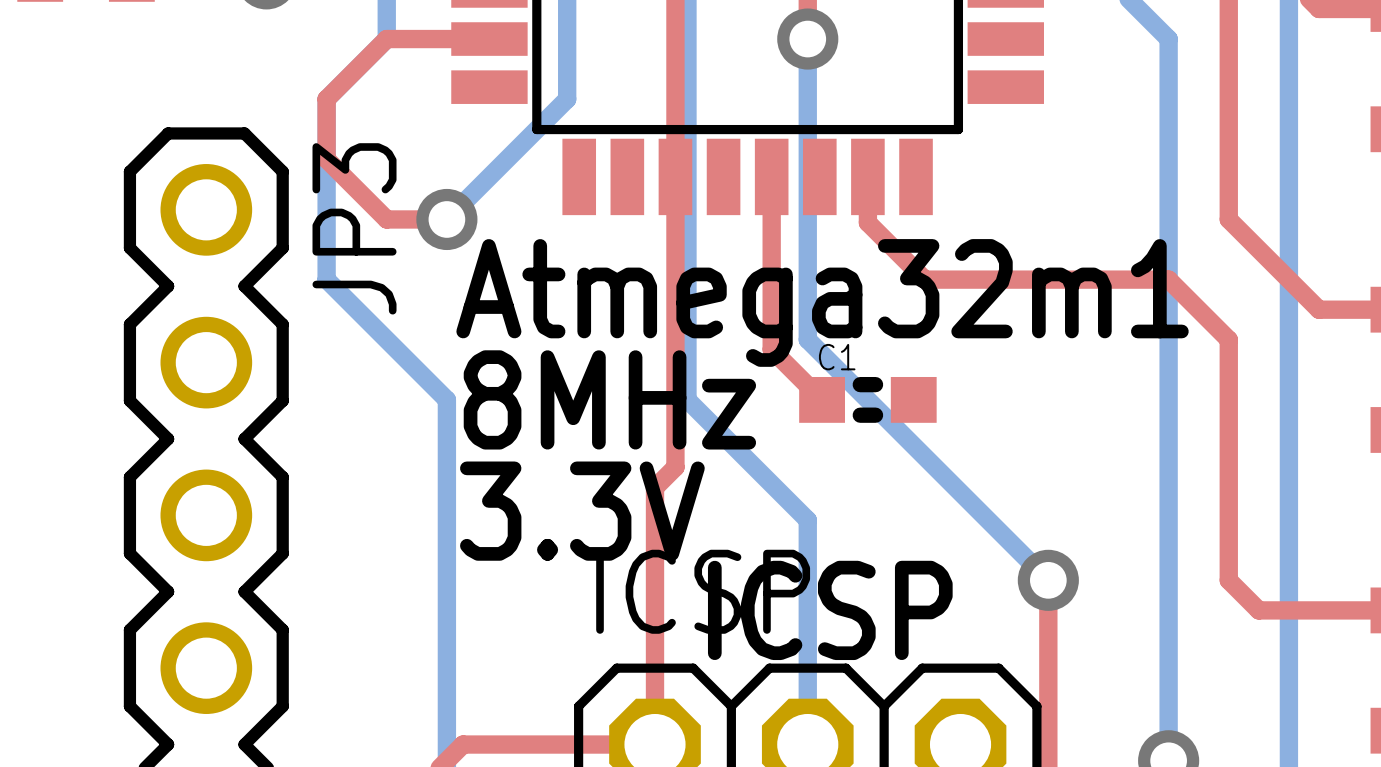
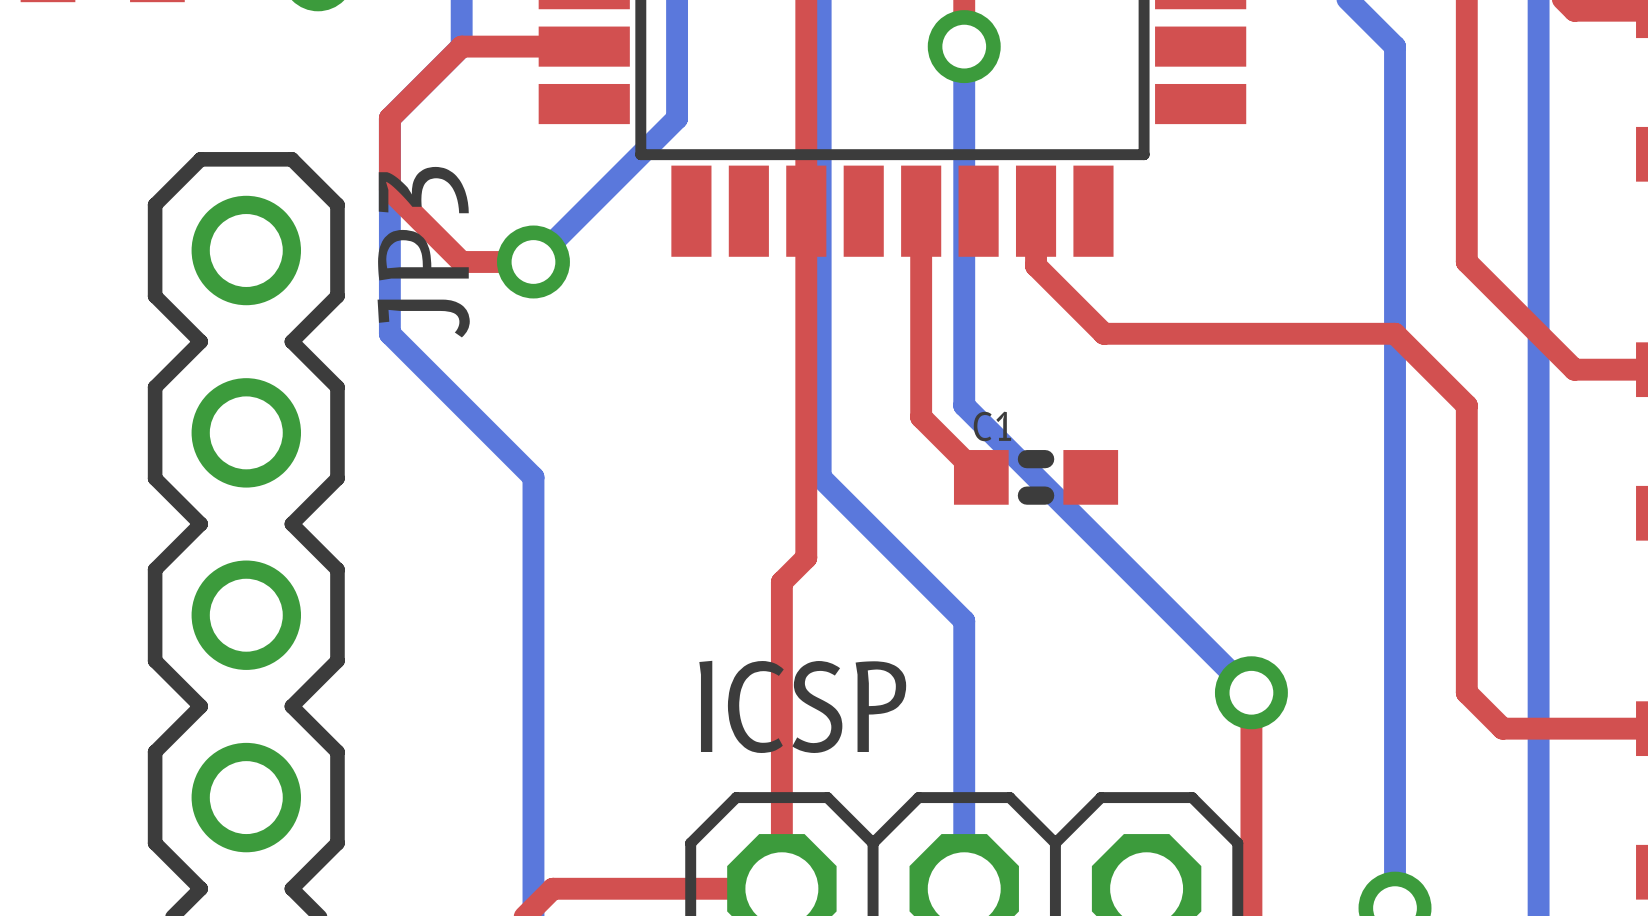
text: Atmega32m1 (822, 302) -> none
text: 8MHz (609, 399) -> none
text: 3.3V (582, 511) -> none
text: ICSP (830, 610) -> none

